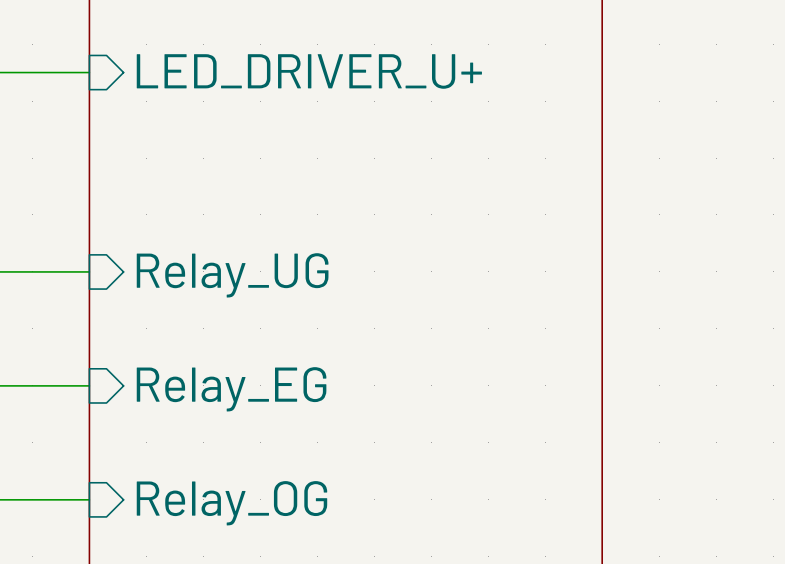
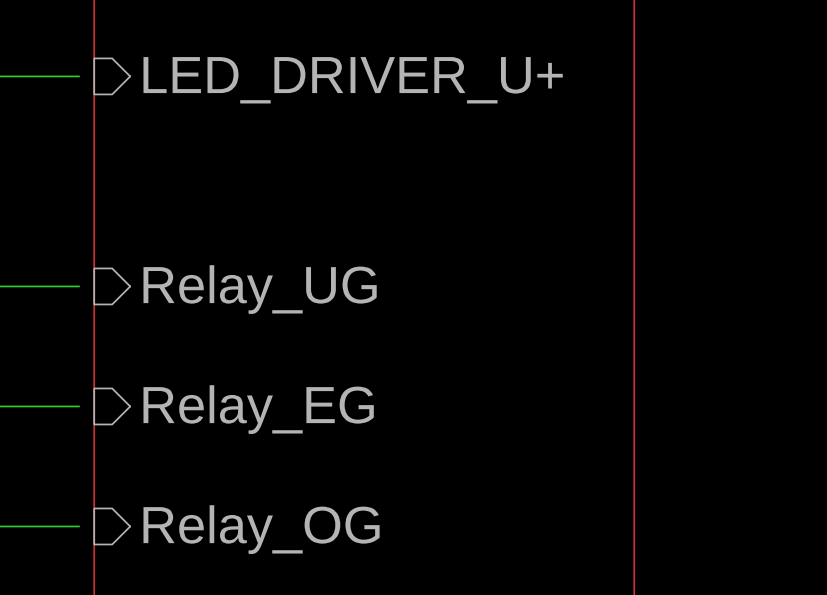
wire: (75, 72) (89, 72) -> none
wire: (75, 271) (89, 271) -> none
wire: (75, 385) (89, 385) -> none
wire: (75, 499) (89, 499) -> none

